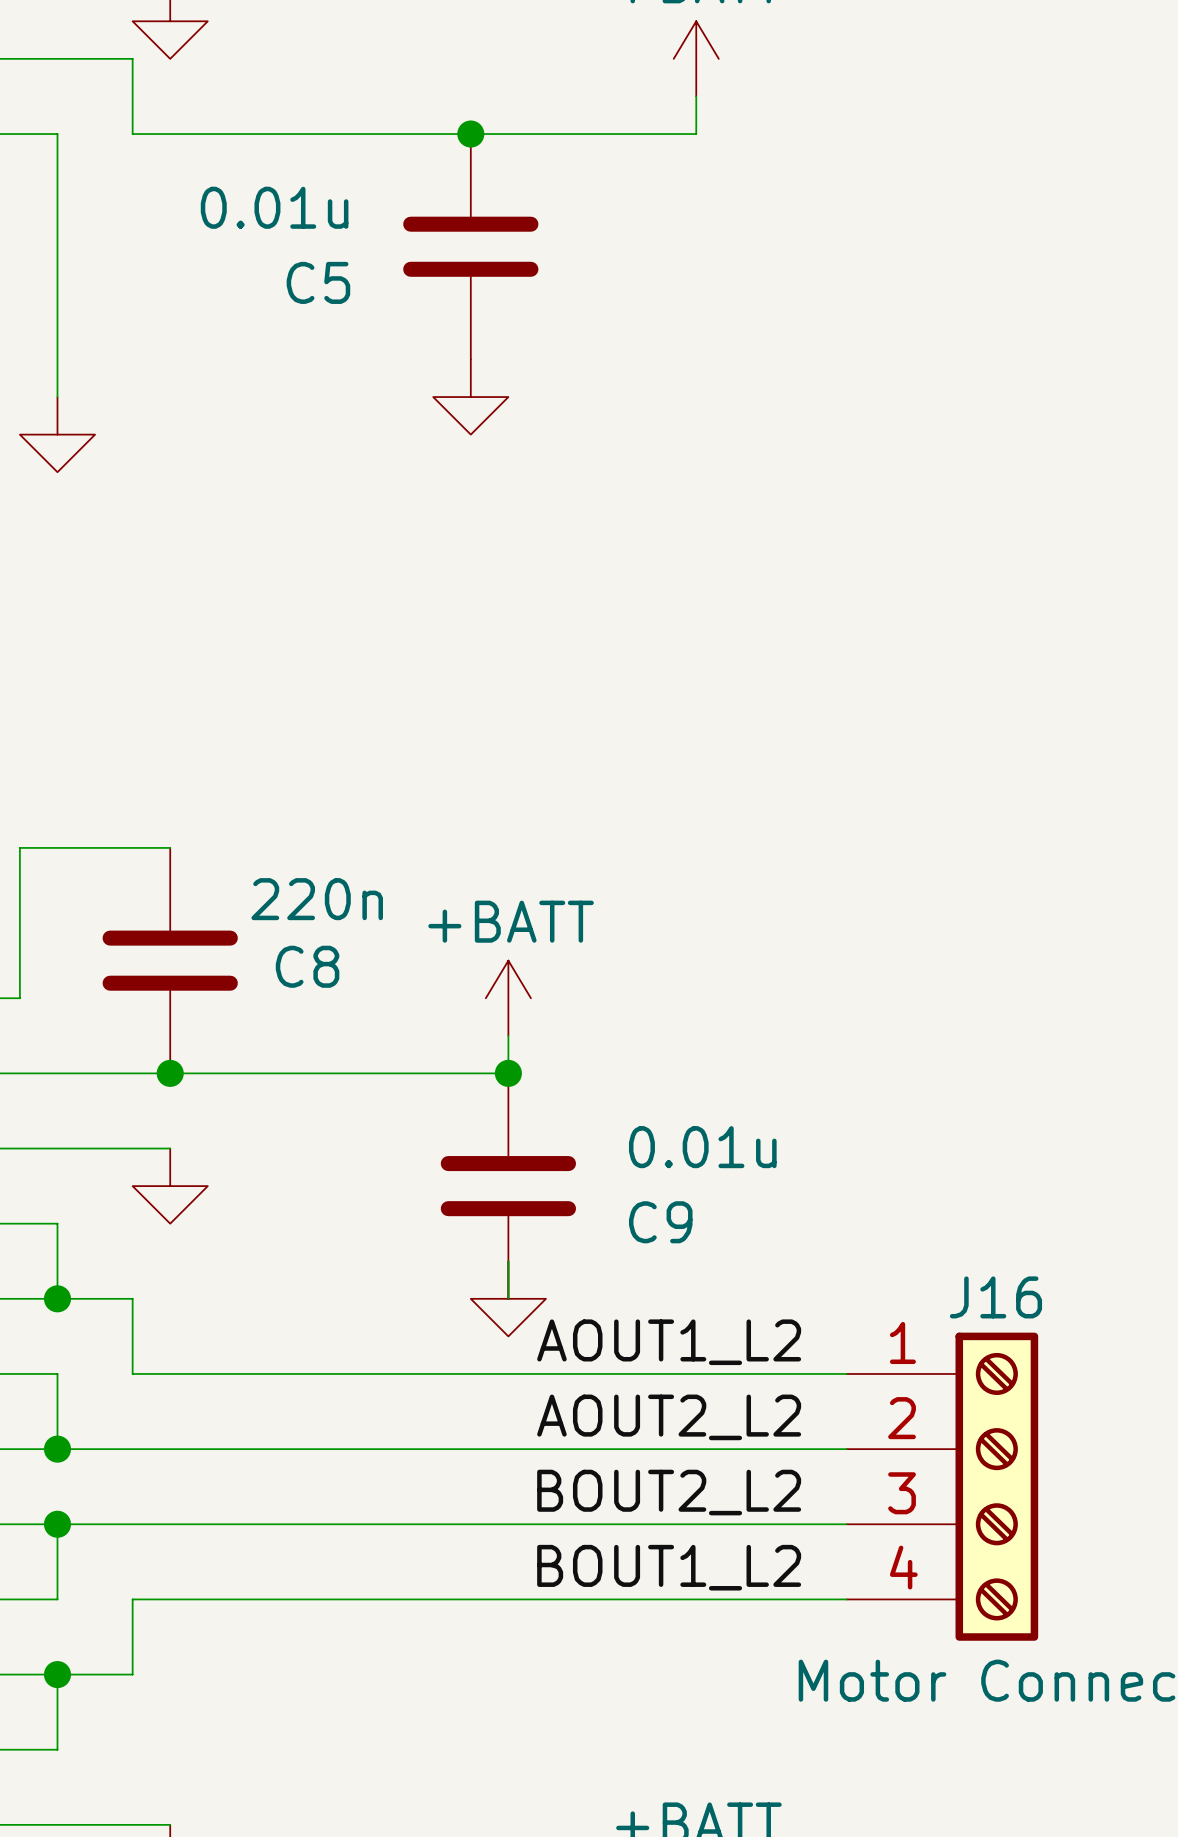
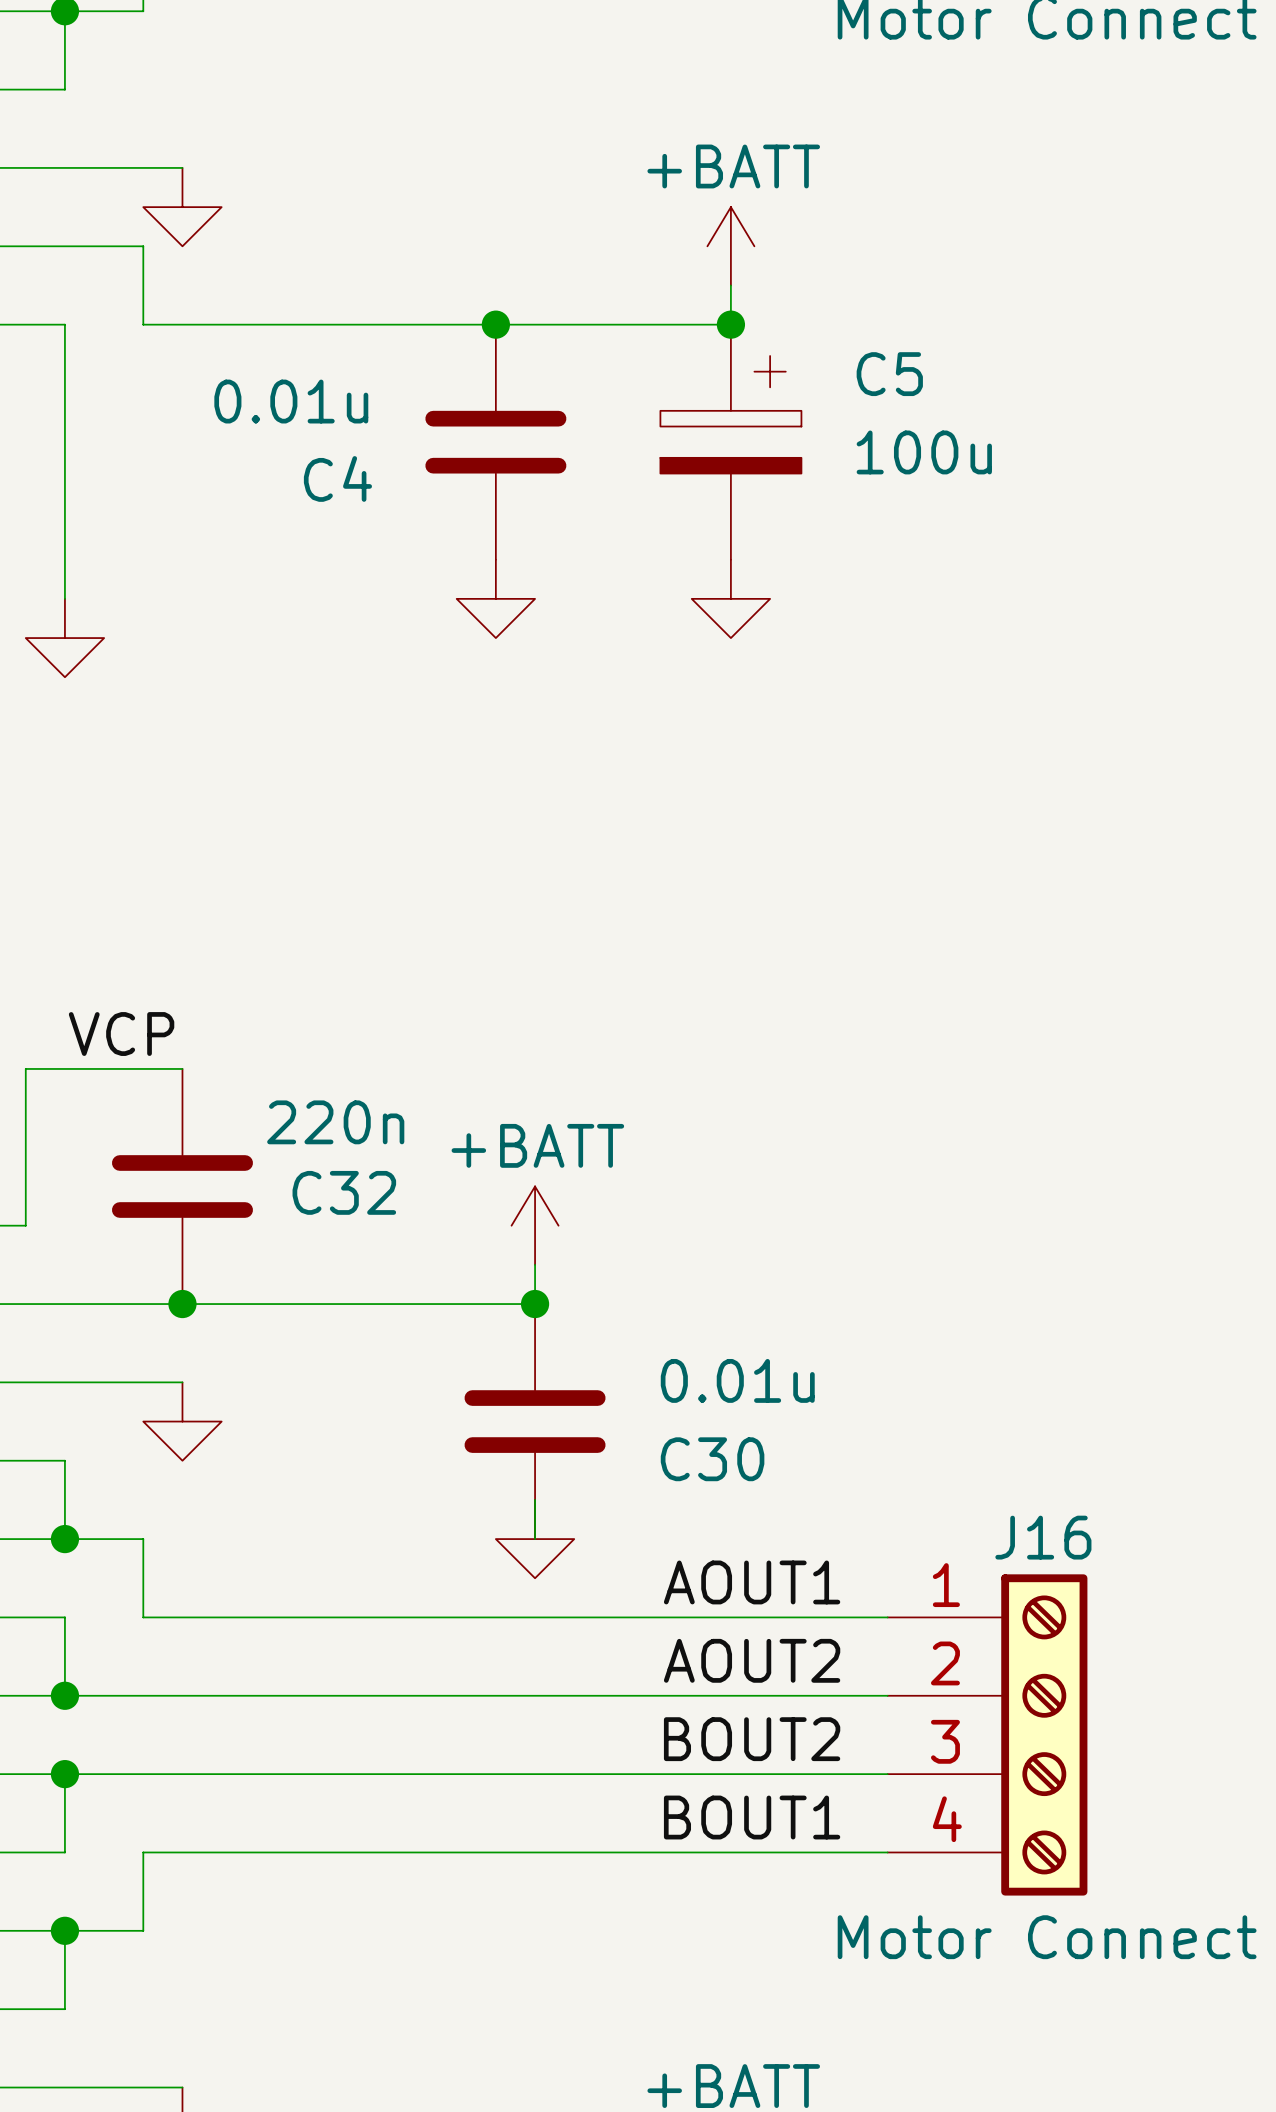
junction: none -> (730, 324)
C5: none -> 100u (730, 442)
C5 name: C5 (318, 282) -> C4 (337, 478)
power symbol: none -> (730, 598)
label: none -> VCP (121, 1034)
C8 name: C8 (307, 966) -> C32 (344, 1192)
C9 name: C9 (660, 1222) -> C30 (712, 1459)
label: AOUT1_L2 (669, 1342) -> AOUT1 (752, 1582)
label: AOUT2_L2 (669, 1417) -> AOUT2 (752, 1660)
label: BOUT2_L2 (669, 1492) -> BOUT2 (752, 1739)
label: BOUT1_L2 (669, 1567) -> BOUT1 (752, 1817)

